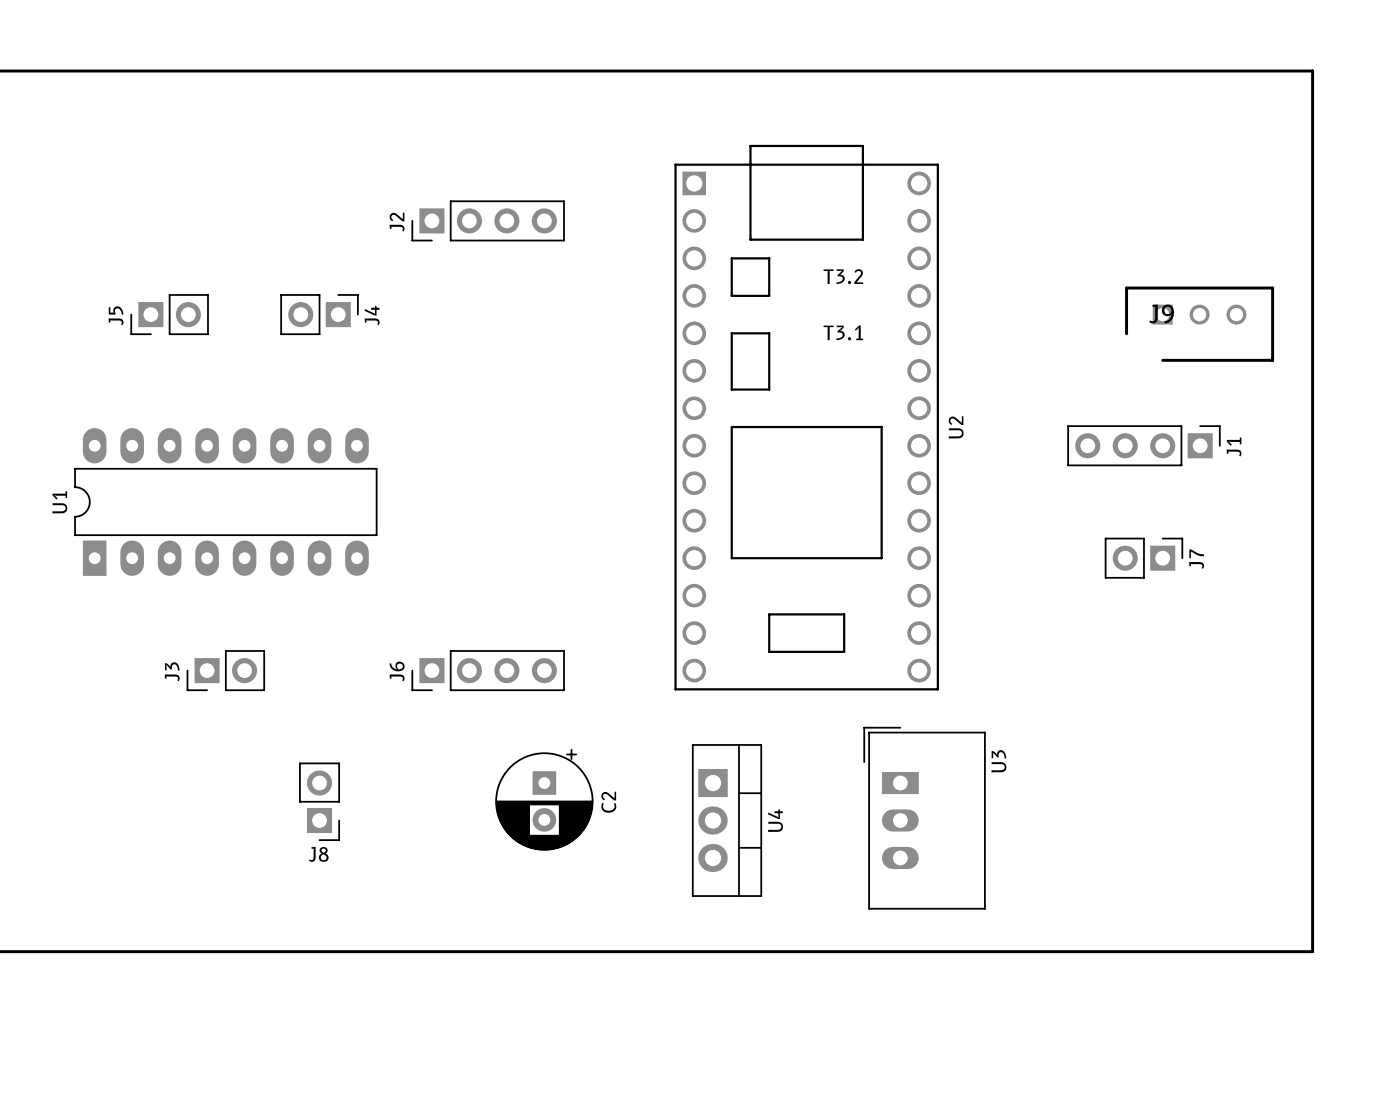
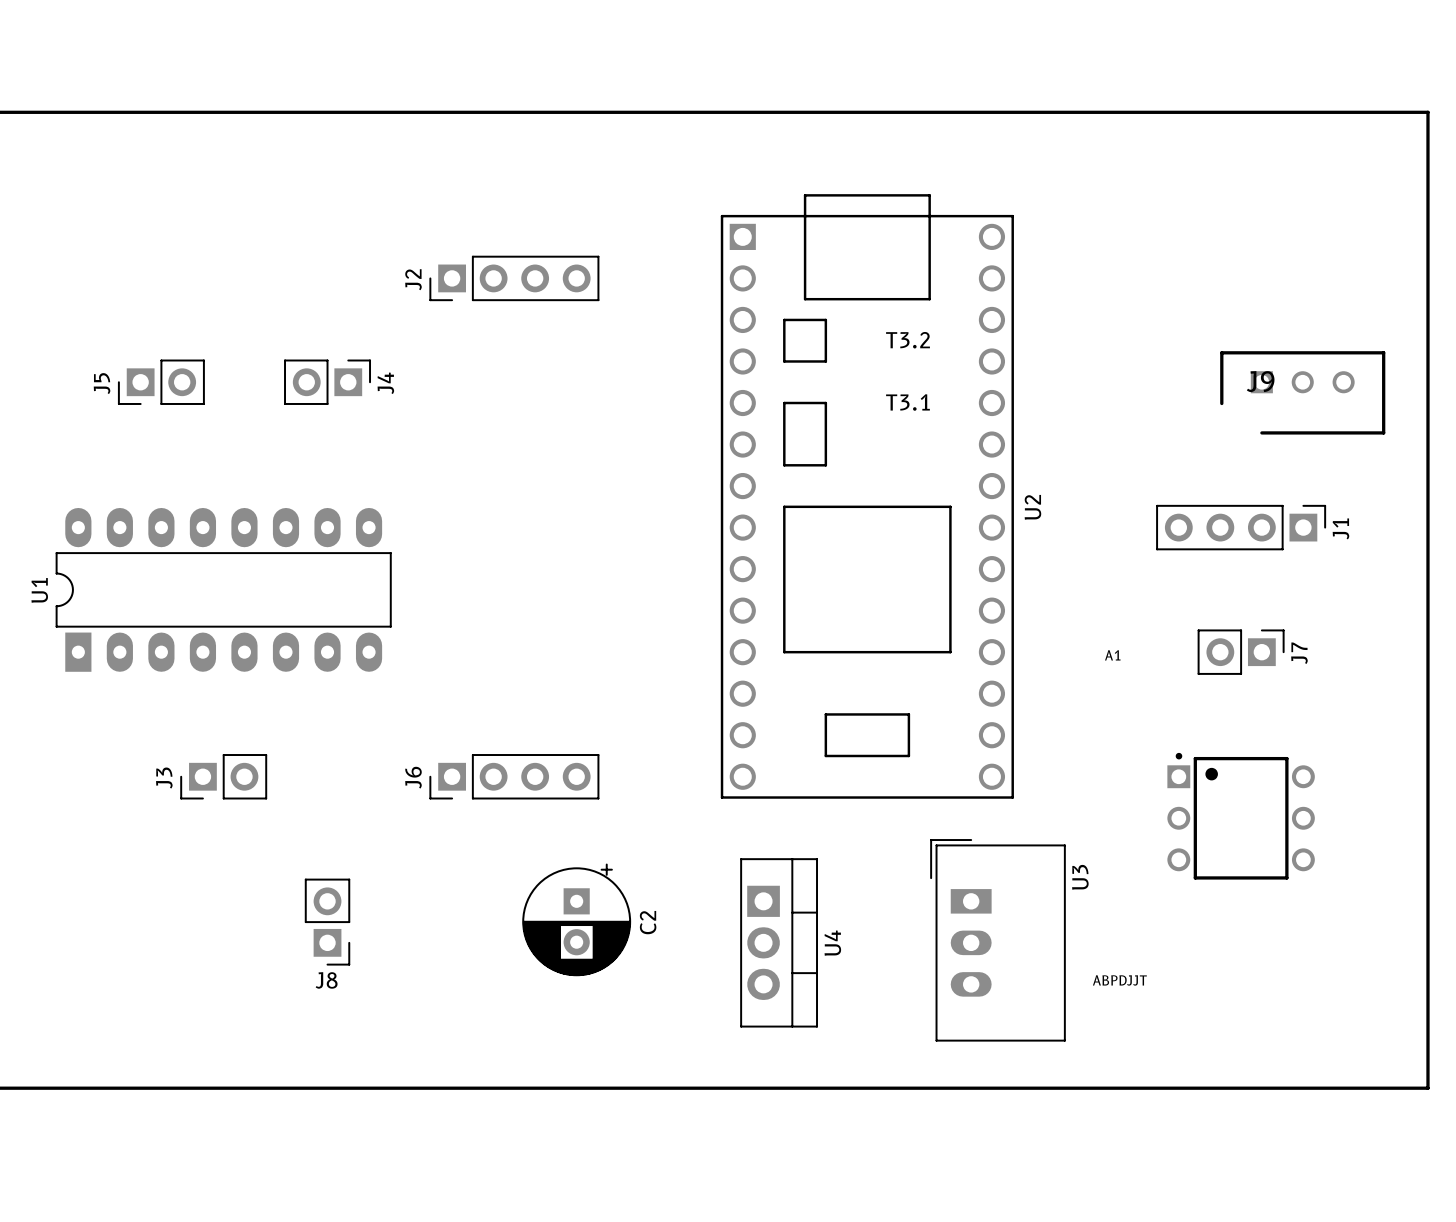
A1: none -> ABPDJJT (1241, 816)

